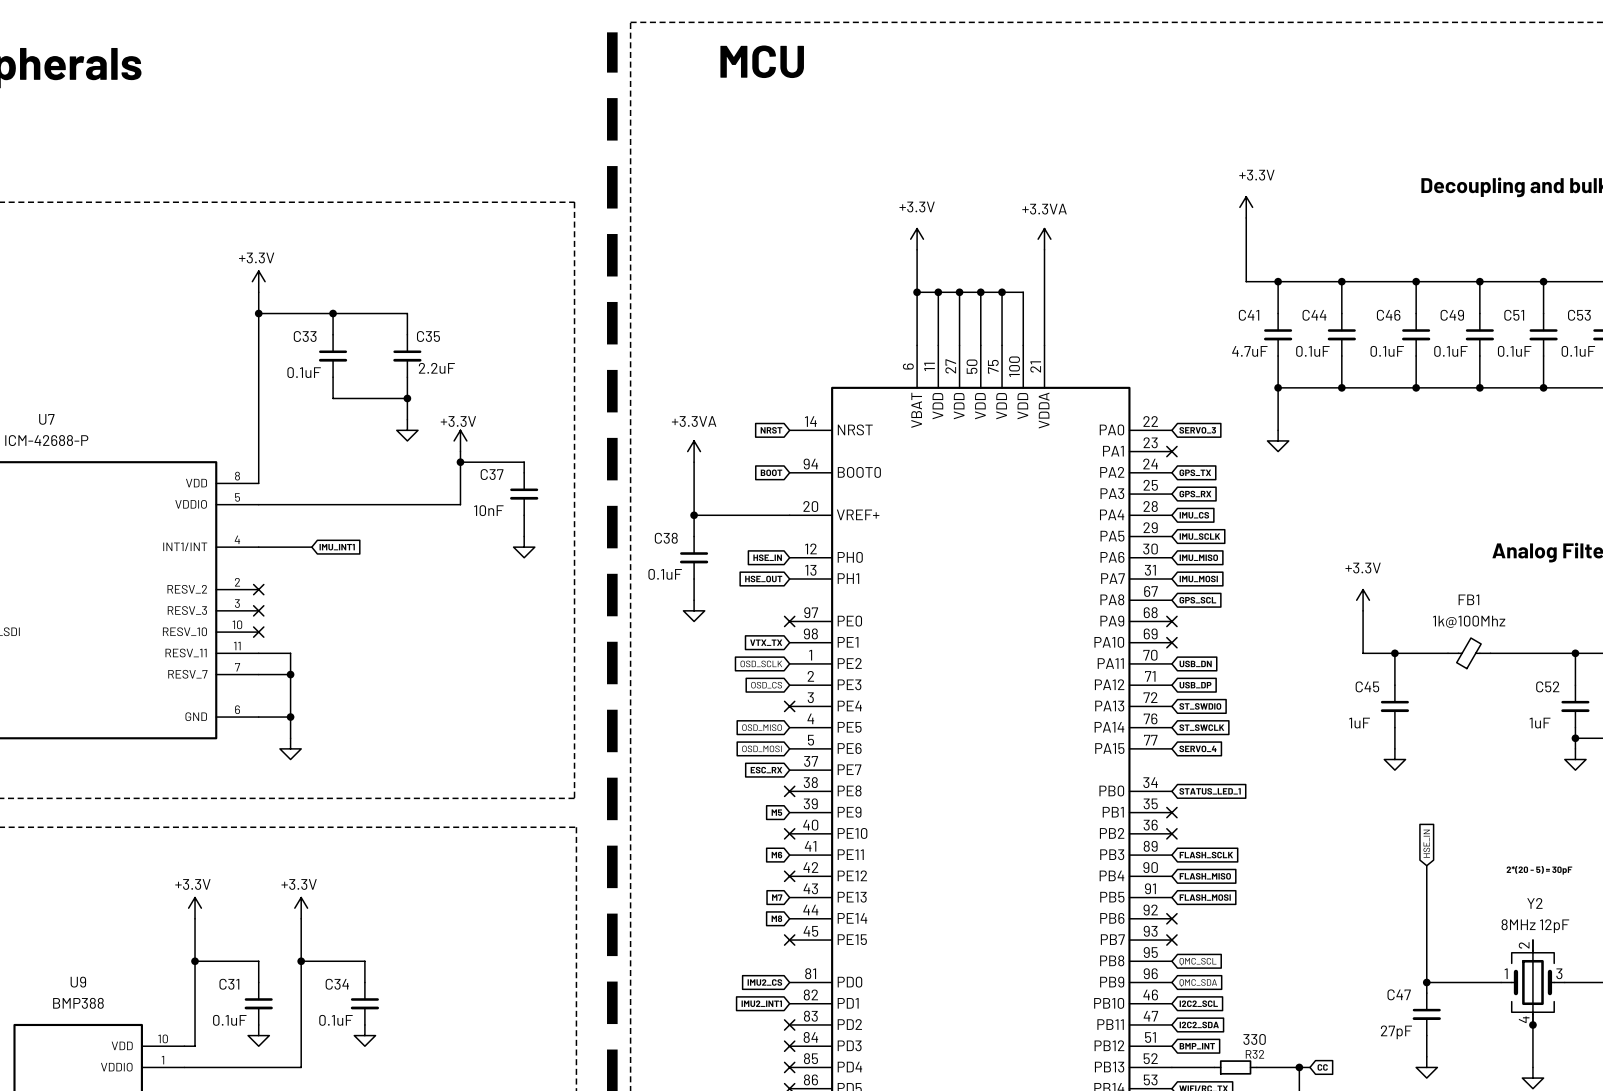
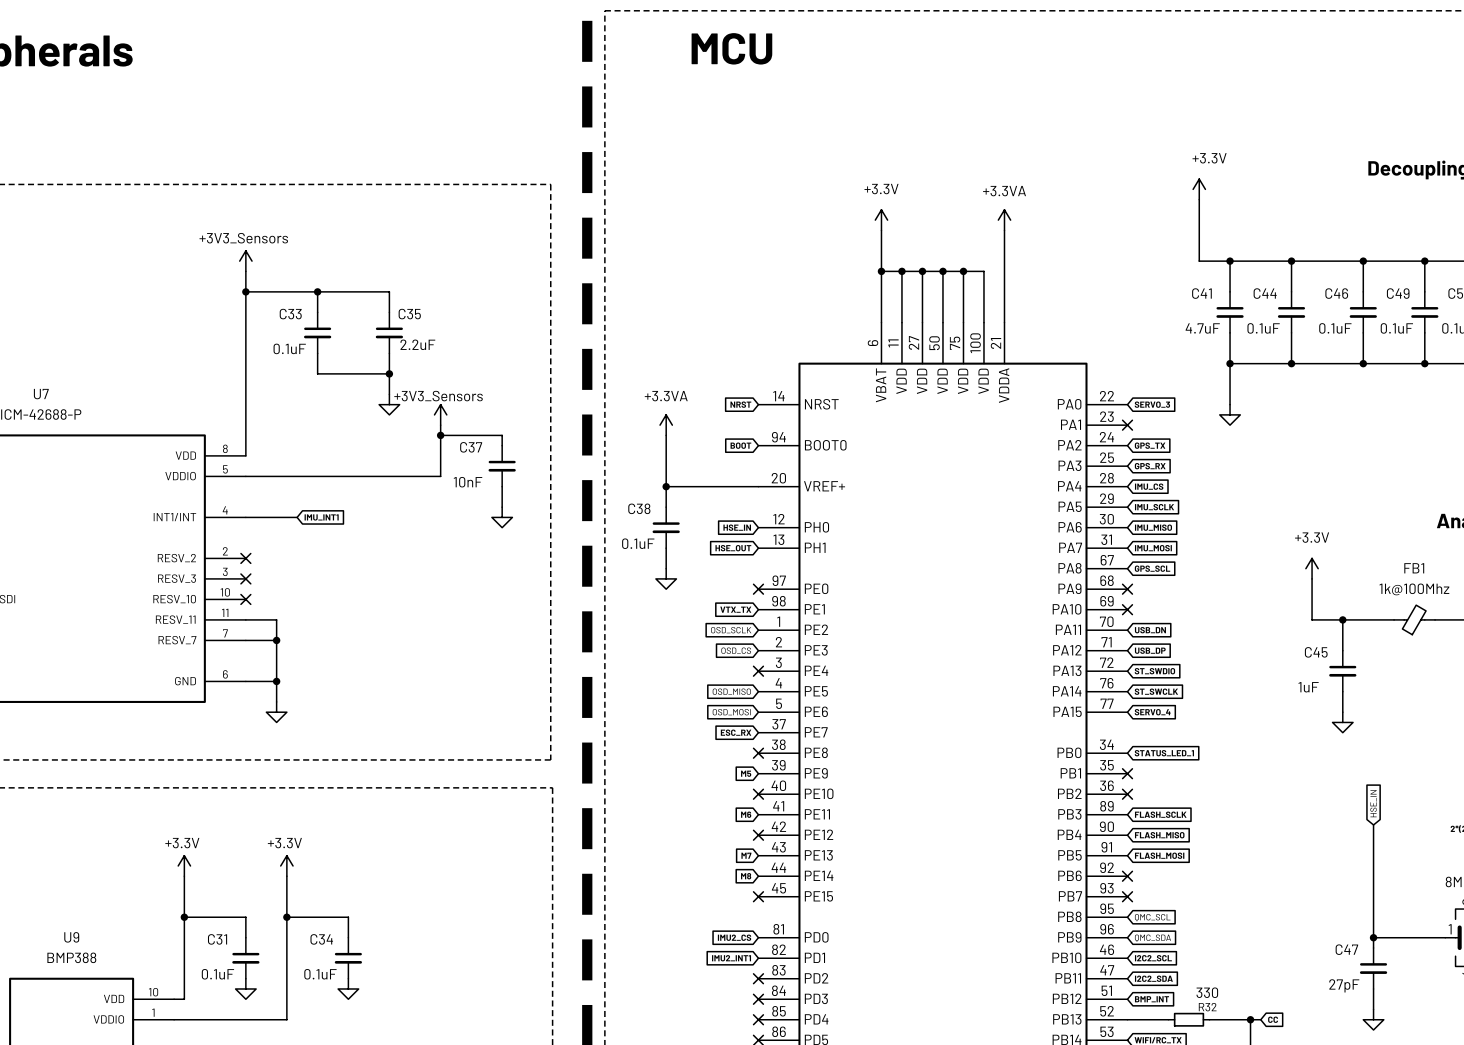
power symbol: +3.3V (258, 281) -> +3V3_Sensors (245, 261)
power symbol: +3.3V (460, 440) -> +3V3_Sensors (440, 414)

